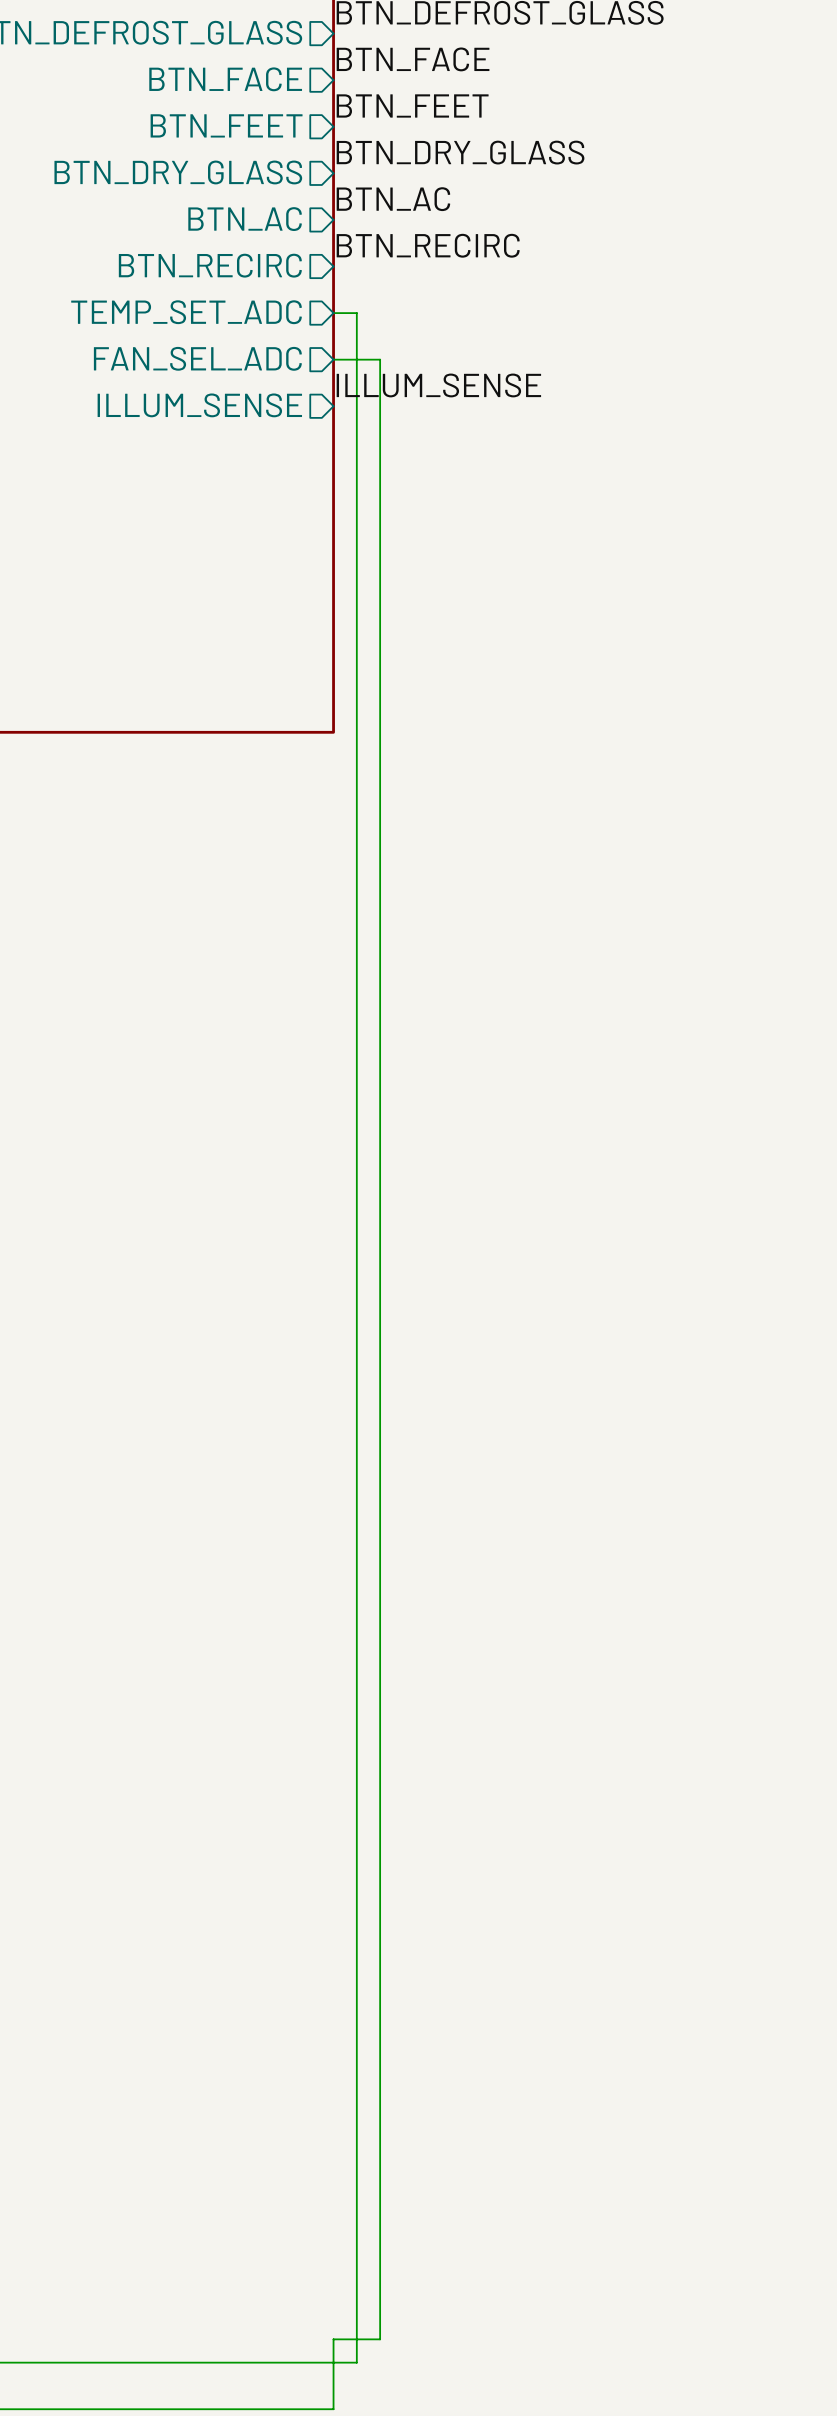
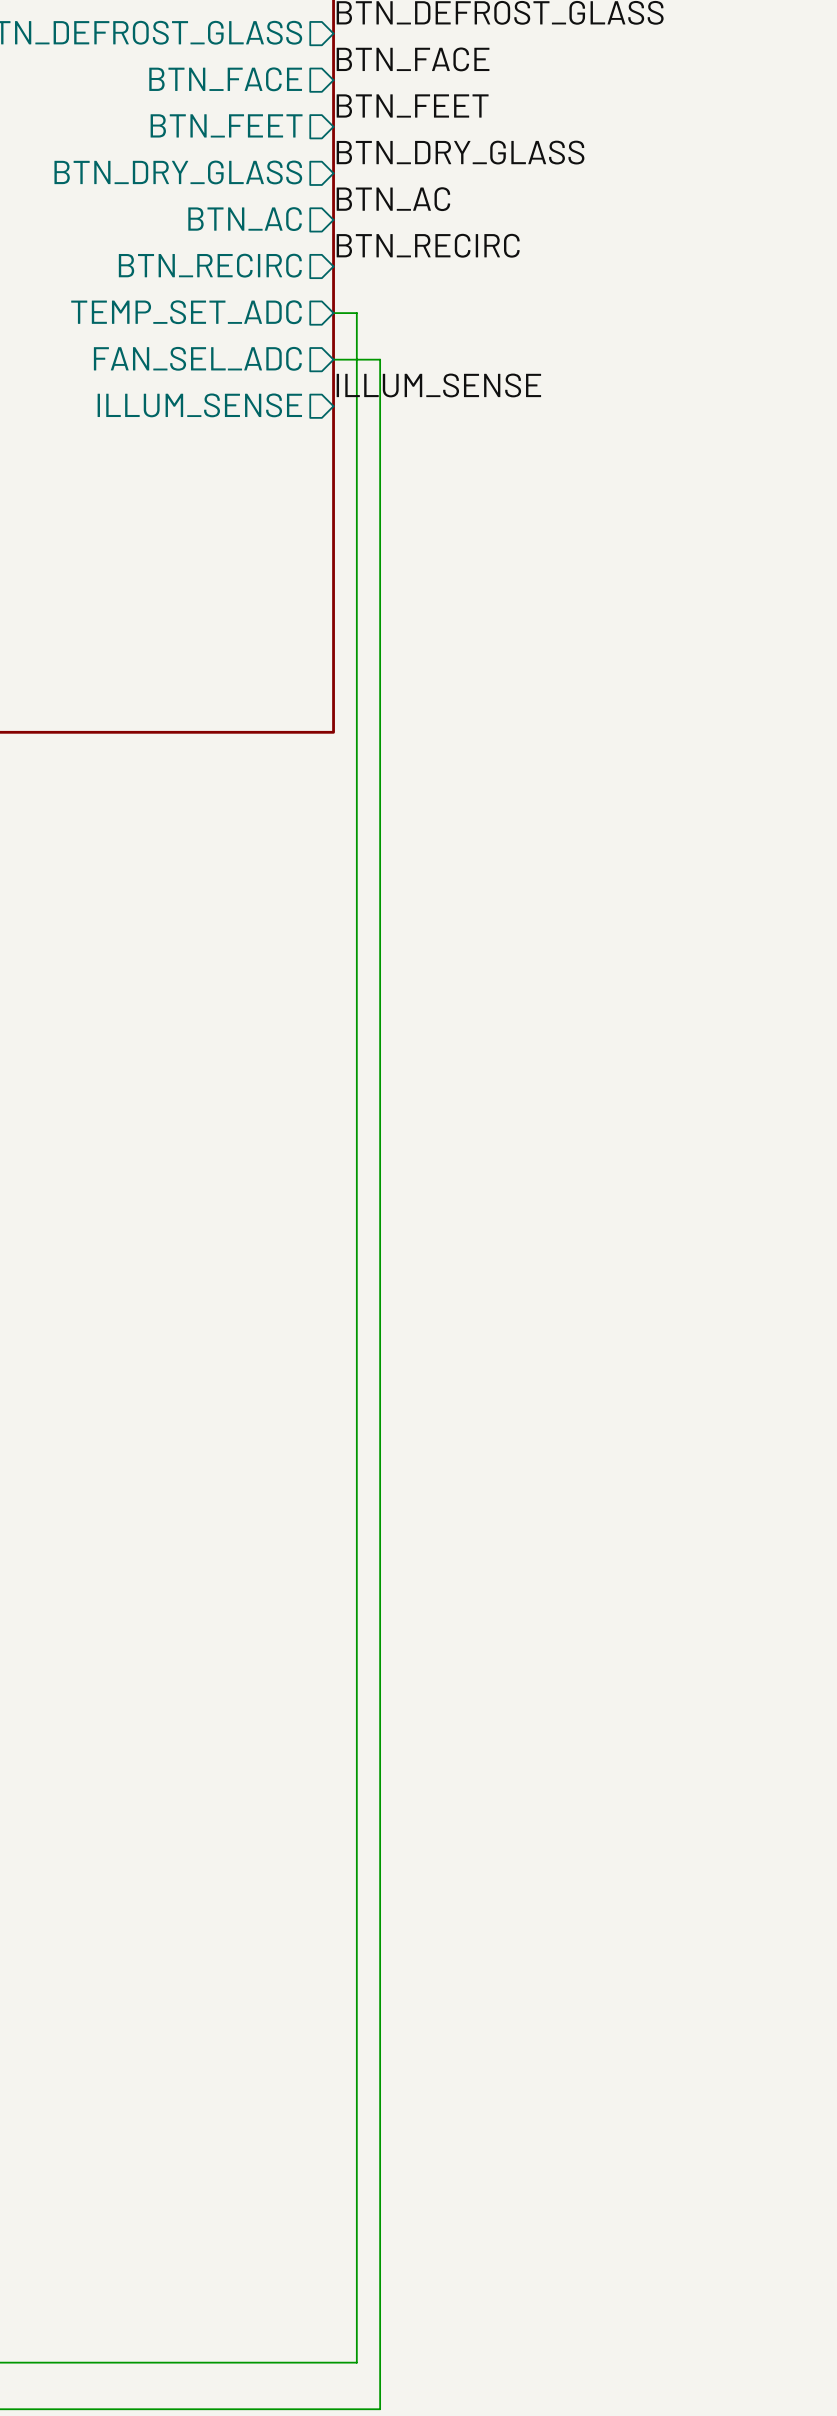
wire: (380, 2339) (333, 2339) (333, 2409) -> (380, 2339) (380, 2409) (333, 2409)

